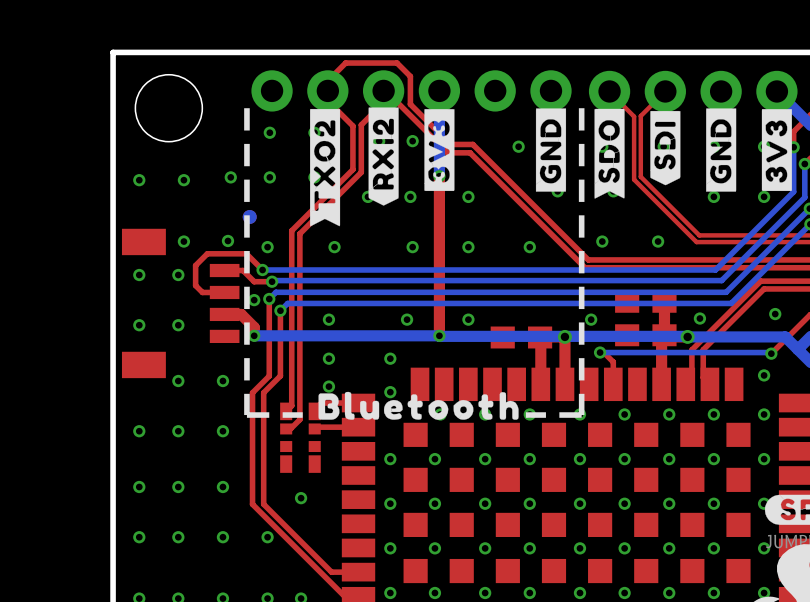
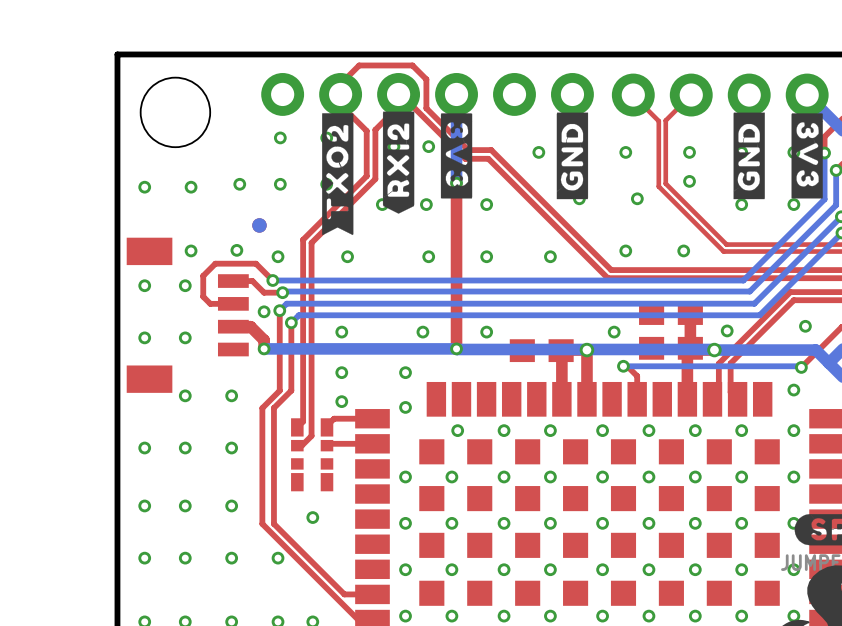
line: (246, 108) (246, 415) (302, 415) -> none
line: (581, 108) (581, 415) (525, 415) -> none
drawing: [594, 108, 681, 199] -> none
drawing shape: [424, 109, 455, 192] -> [440, 113, 473, 199]
drawing shape: [761, 109, 792, 192] -> [791, 113, 823, 199]
drawing: [318, 391, 519, 420] -> none

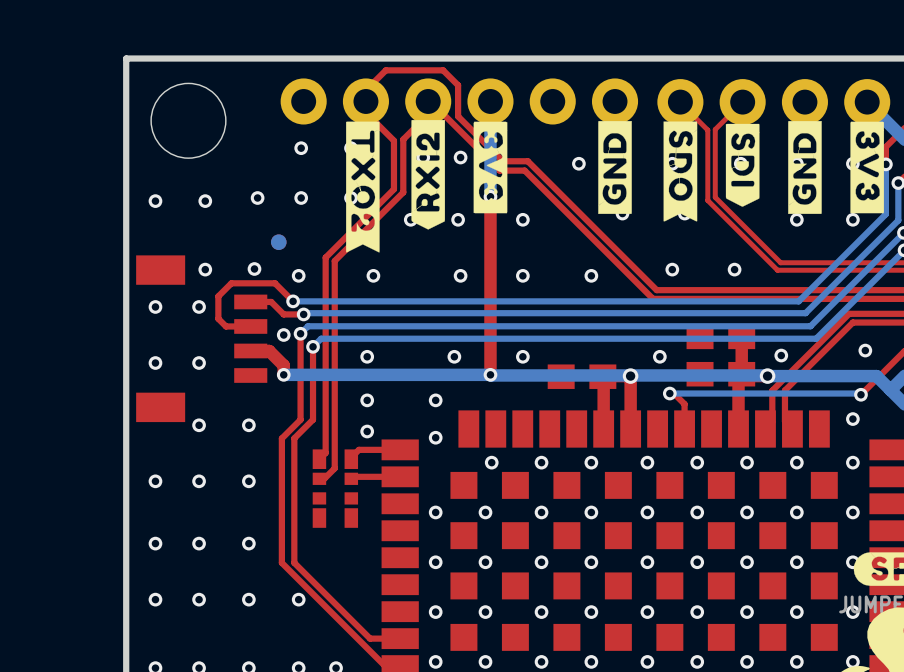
drawing shape: [322, 113, 354, 236] -> [346, 121, 380, 253]
drawing: none -> [663, 121, 760, 222]
via: (312, 517) -> none

